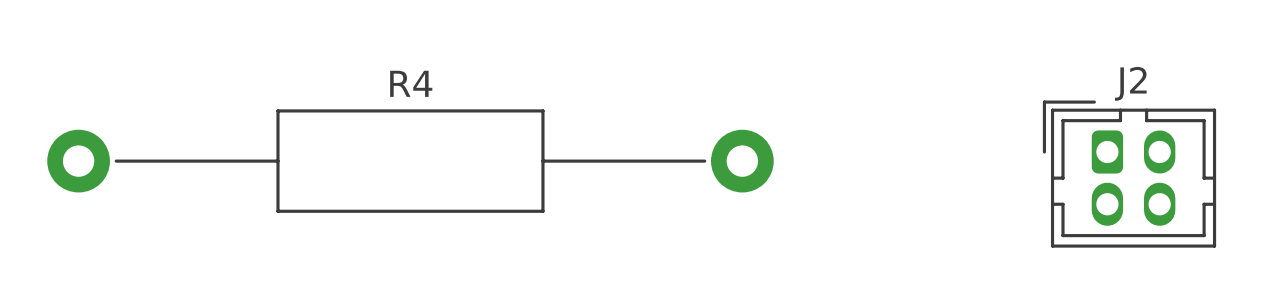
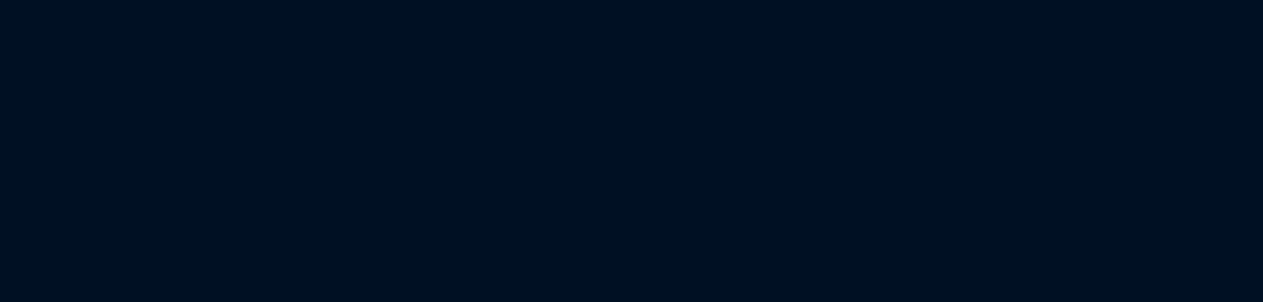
R4: (410, 161) -> none
J2: (1129, 174) -> none

